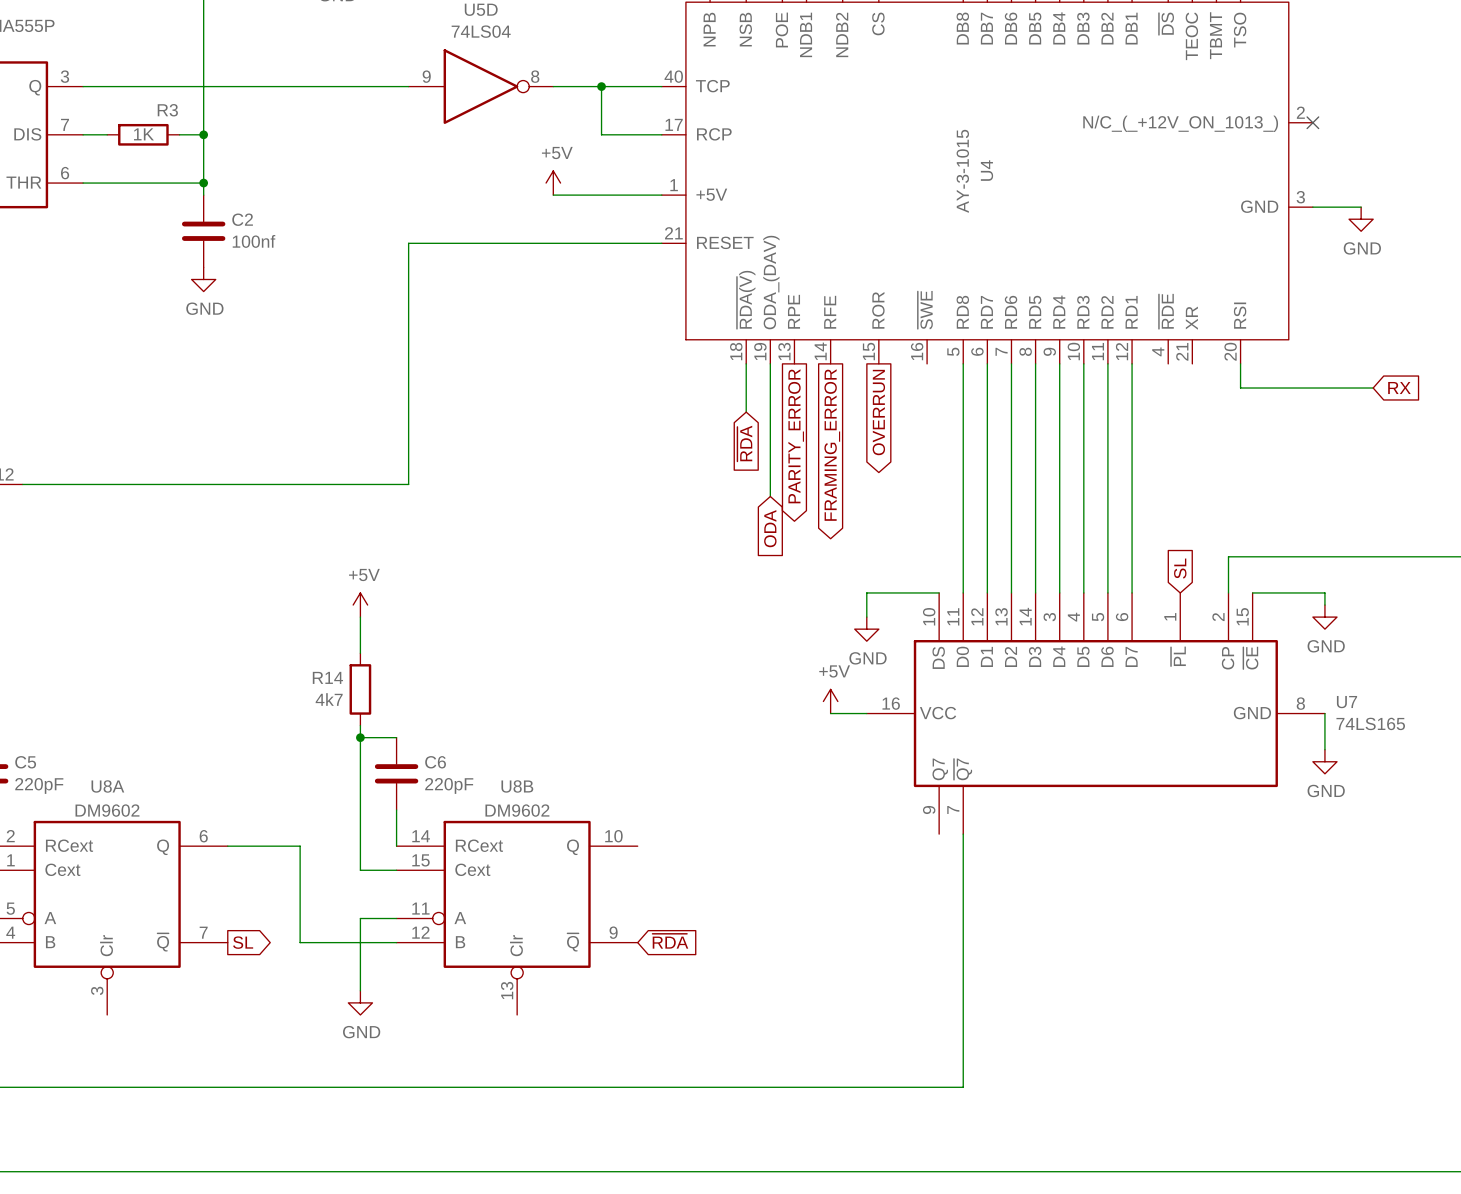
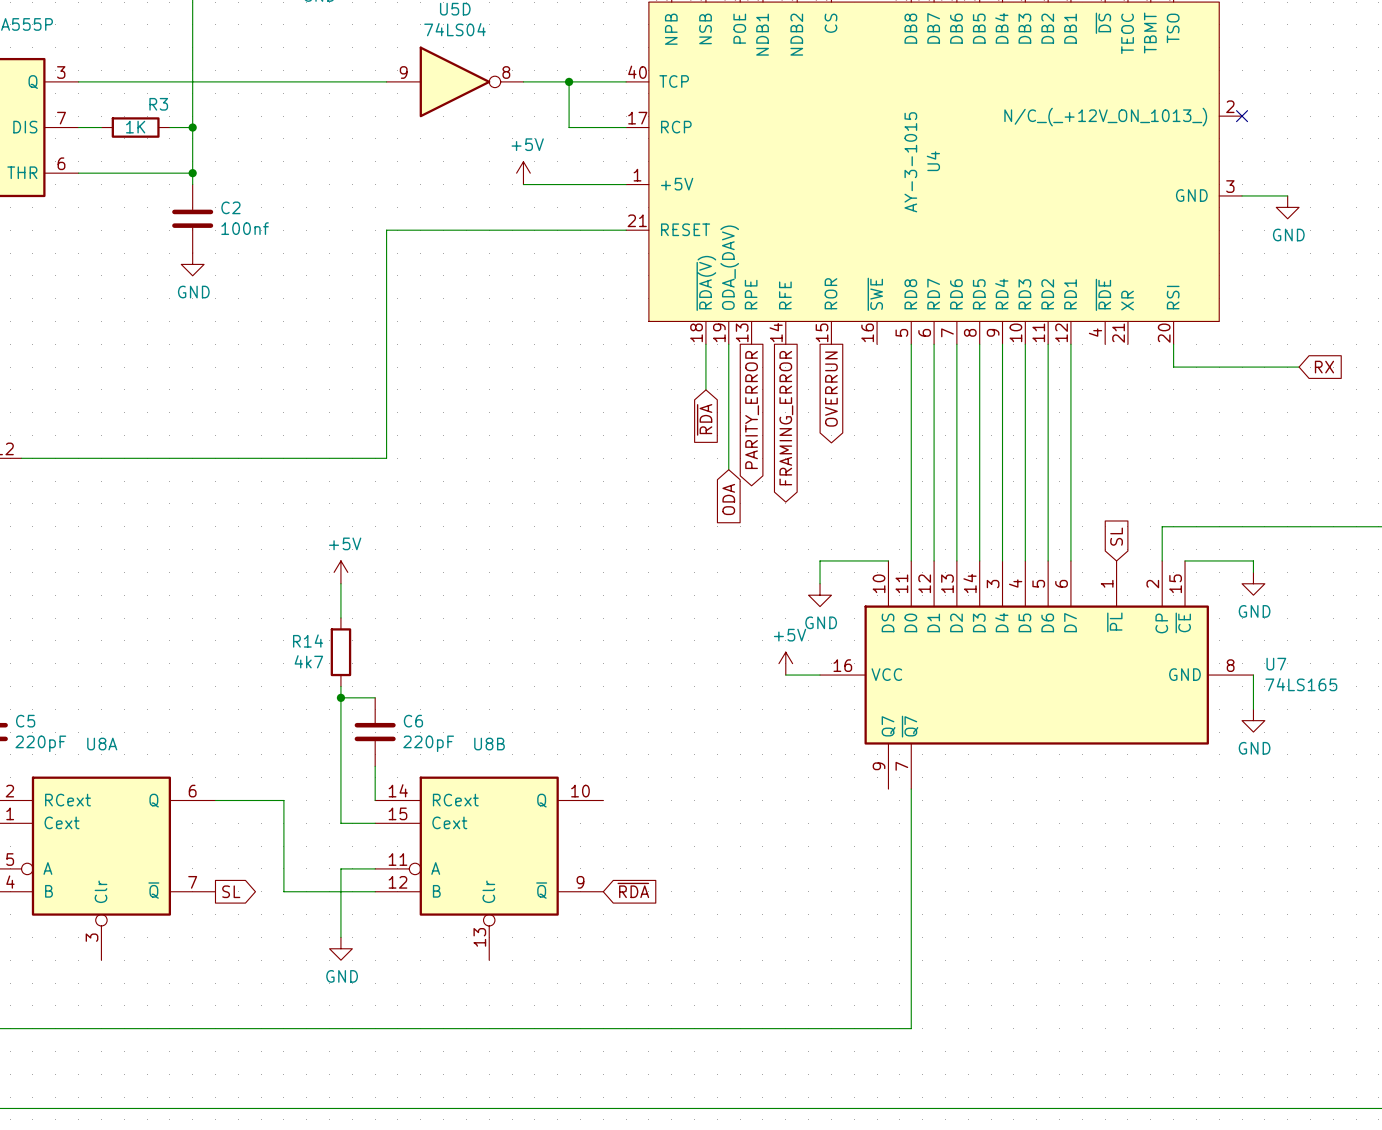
U8A value: DM9602 (107, 810) -> none
U8B value: DM9602 (517, 810) -> none

